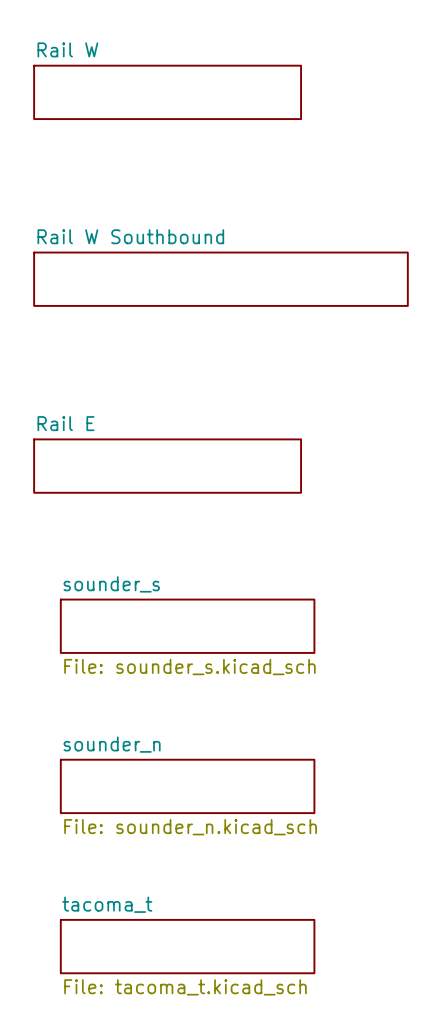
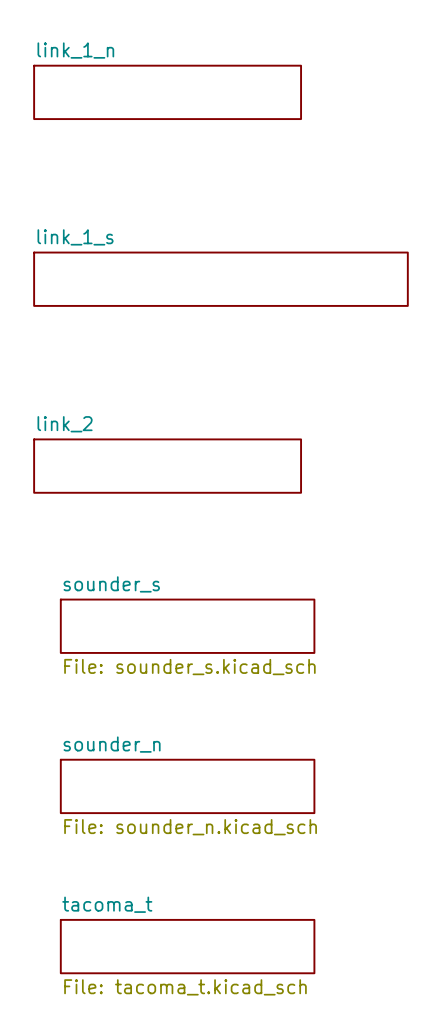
sheet Rail W name: Rail W (67, 49) -> link_1_n (75, 50)
sheet Rail W Southbound name: Rail W Southbound (130, 236) -> link_1_s (75, 237)
sheet Rail E name: Rail E (65, 423) -> link_2 (65, 424)

